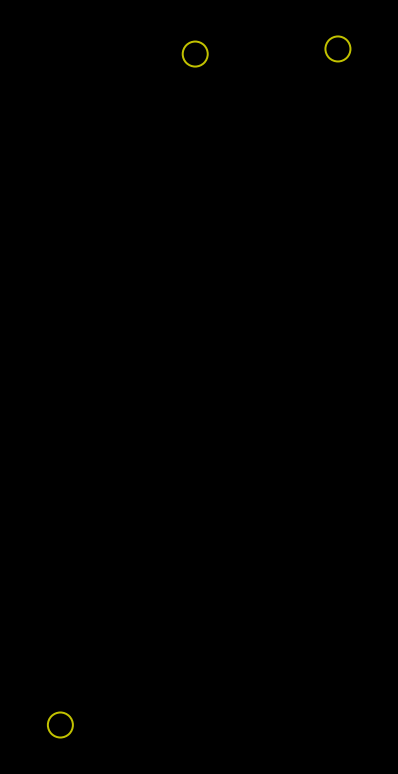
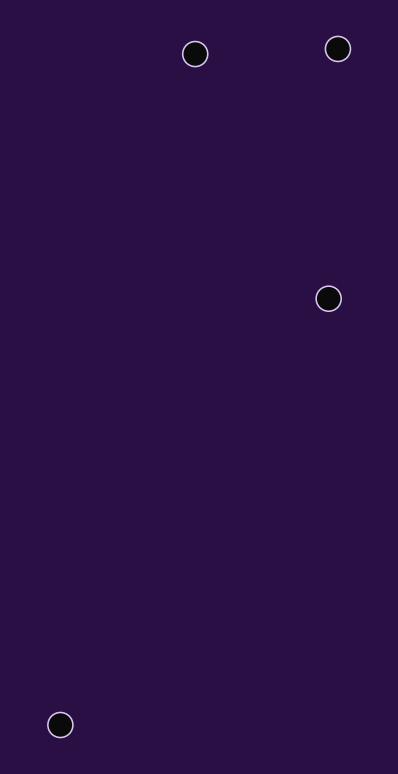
part: none -> (328, 298)

